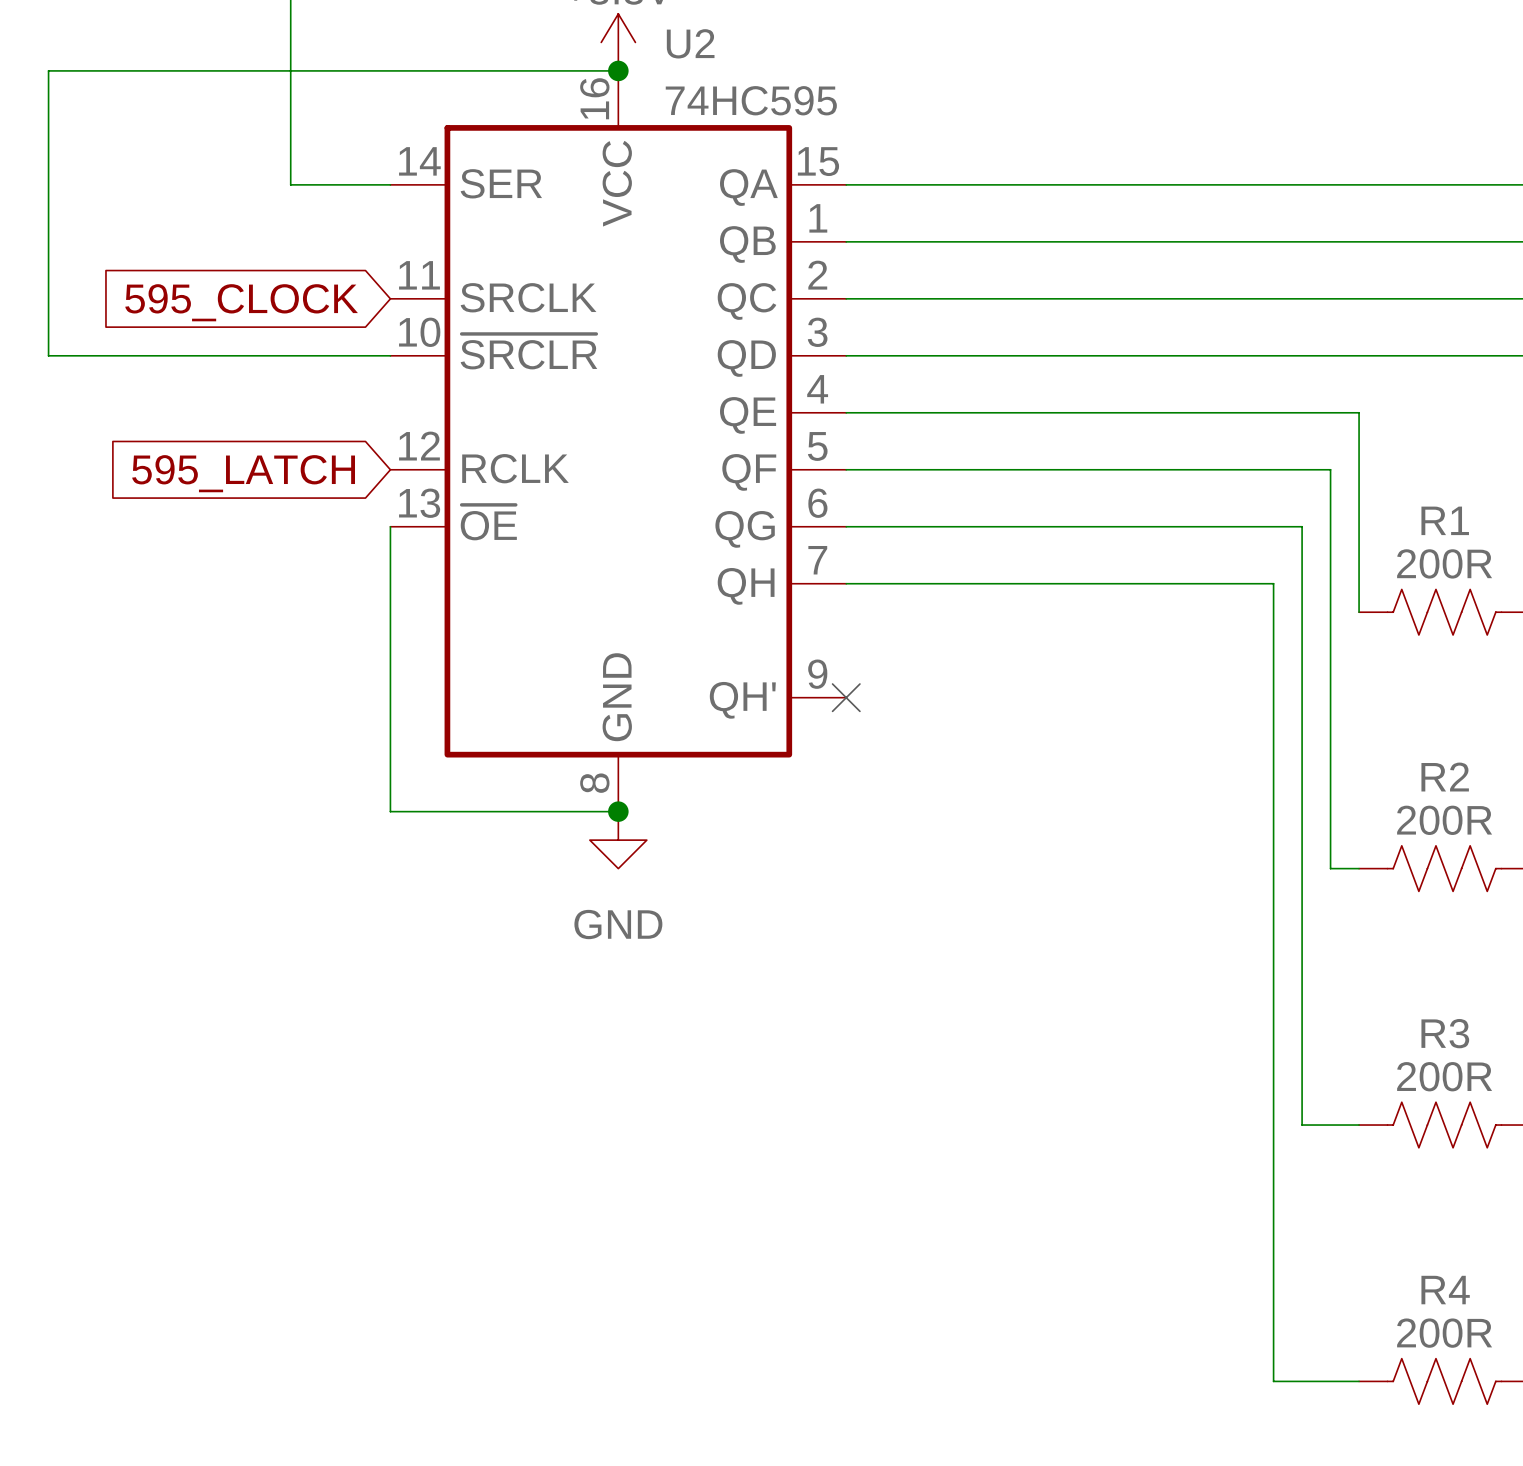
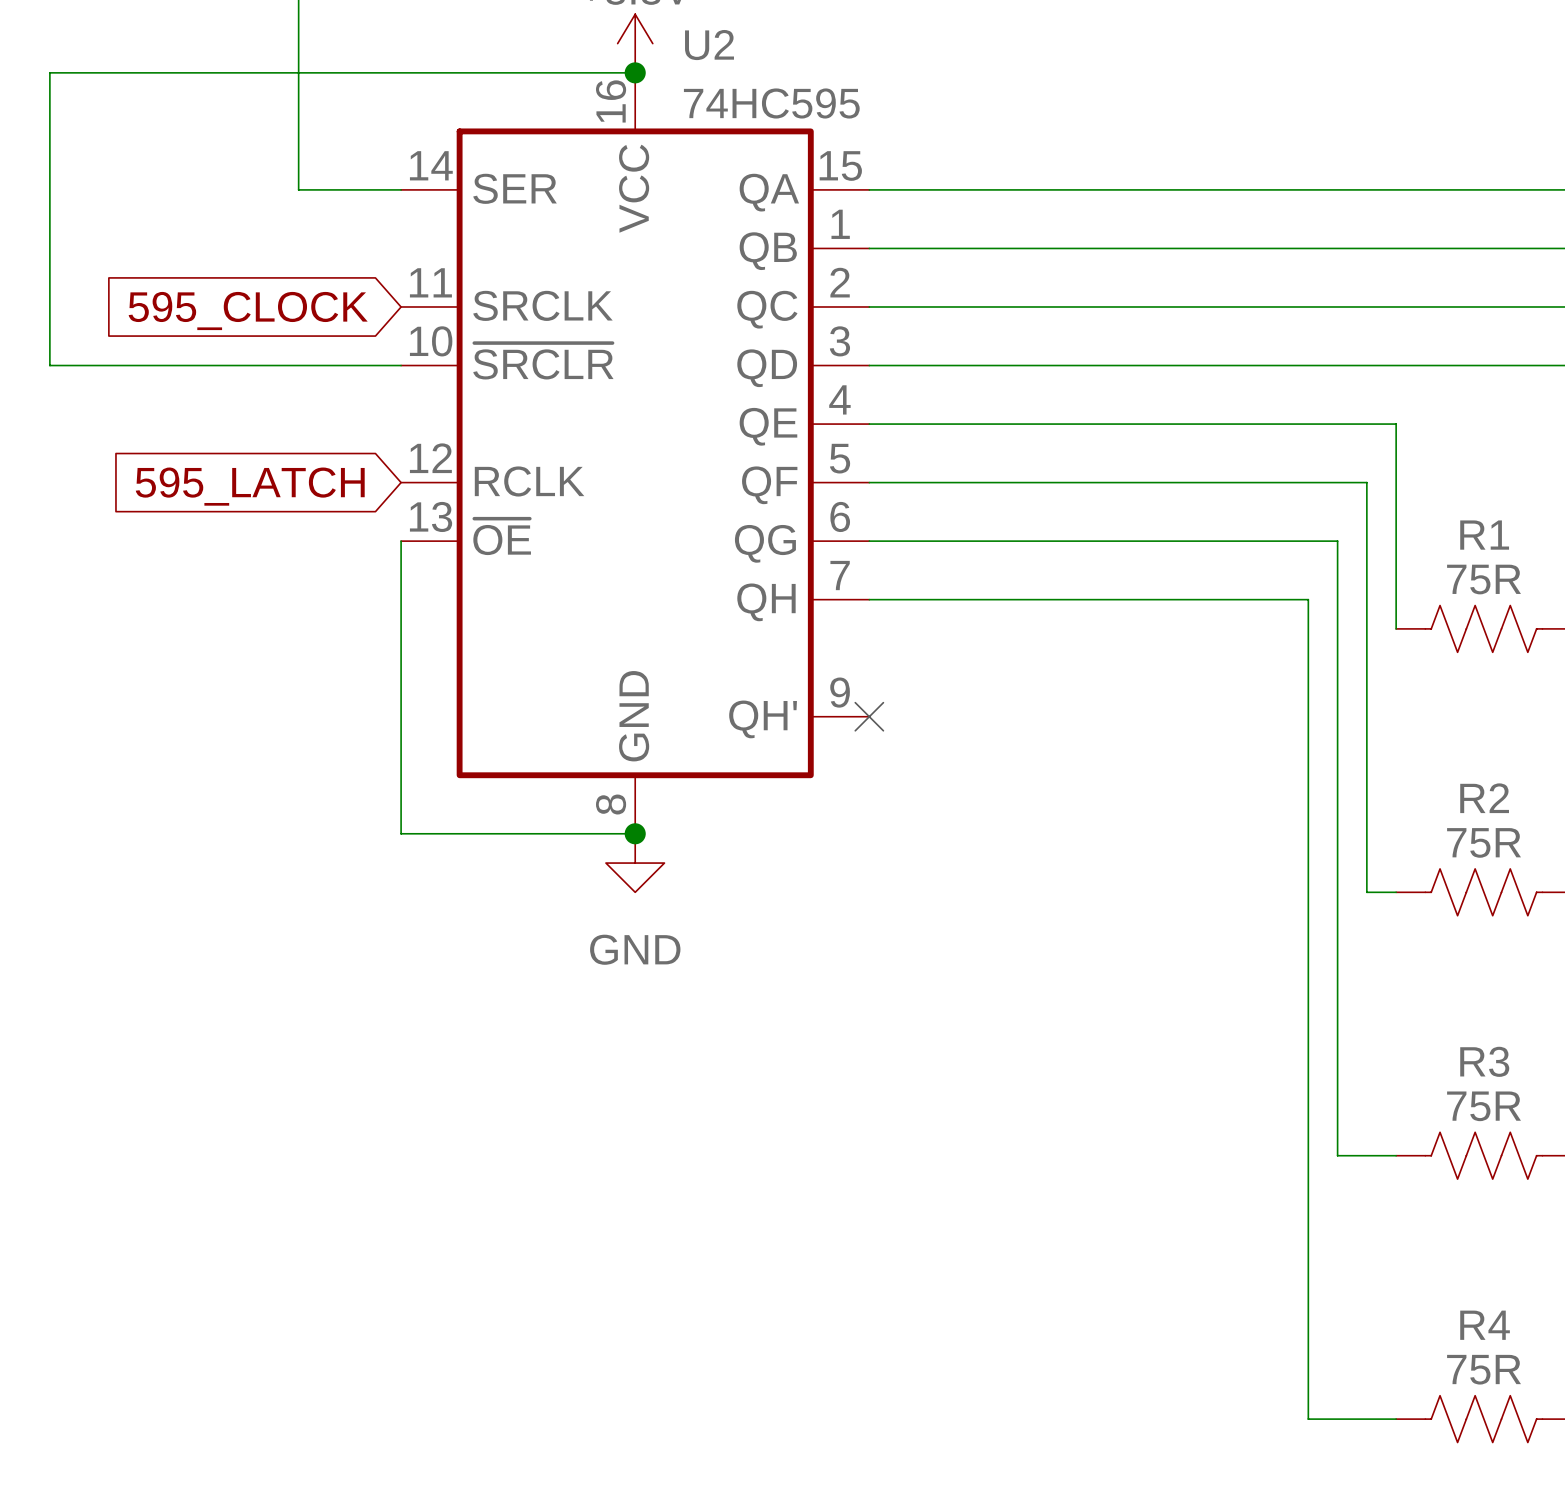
R1 value: 200R (1444, 563) -> 75R (1484, 579)
R2 value: 200R (1444, 820) -> 75R (1484, 842)
R3 value: 200R (1444, 1076) -> 75R (1484, 1106)
R4 value: 200R (1444, 1333) -> 75R (1484, 1369)

